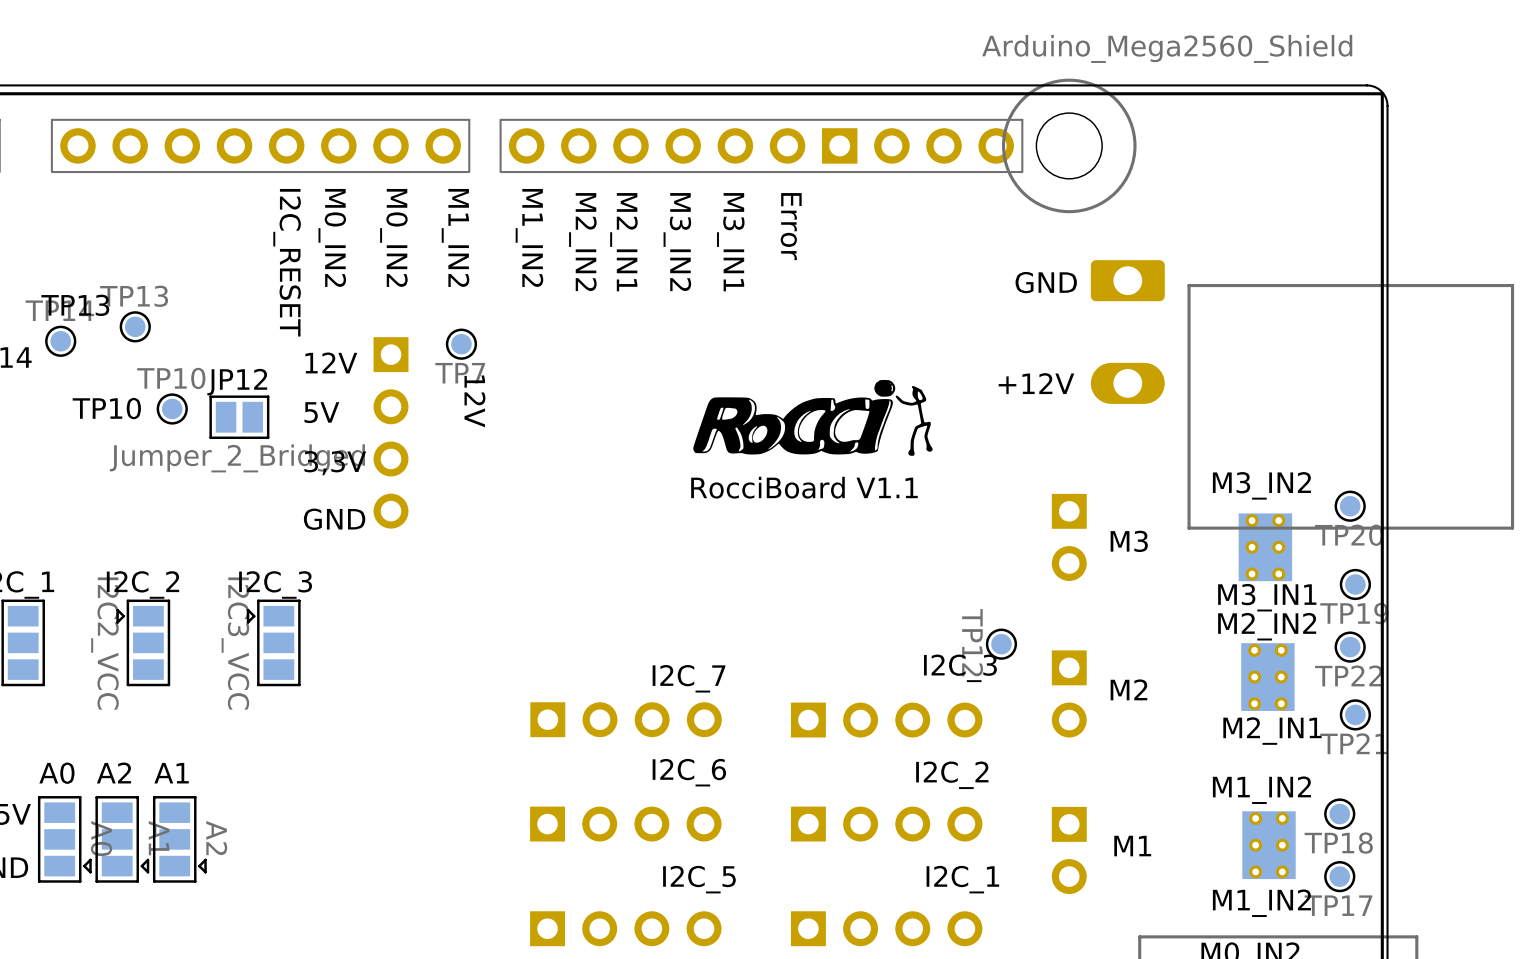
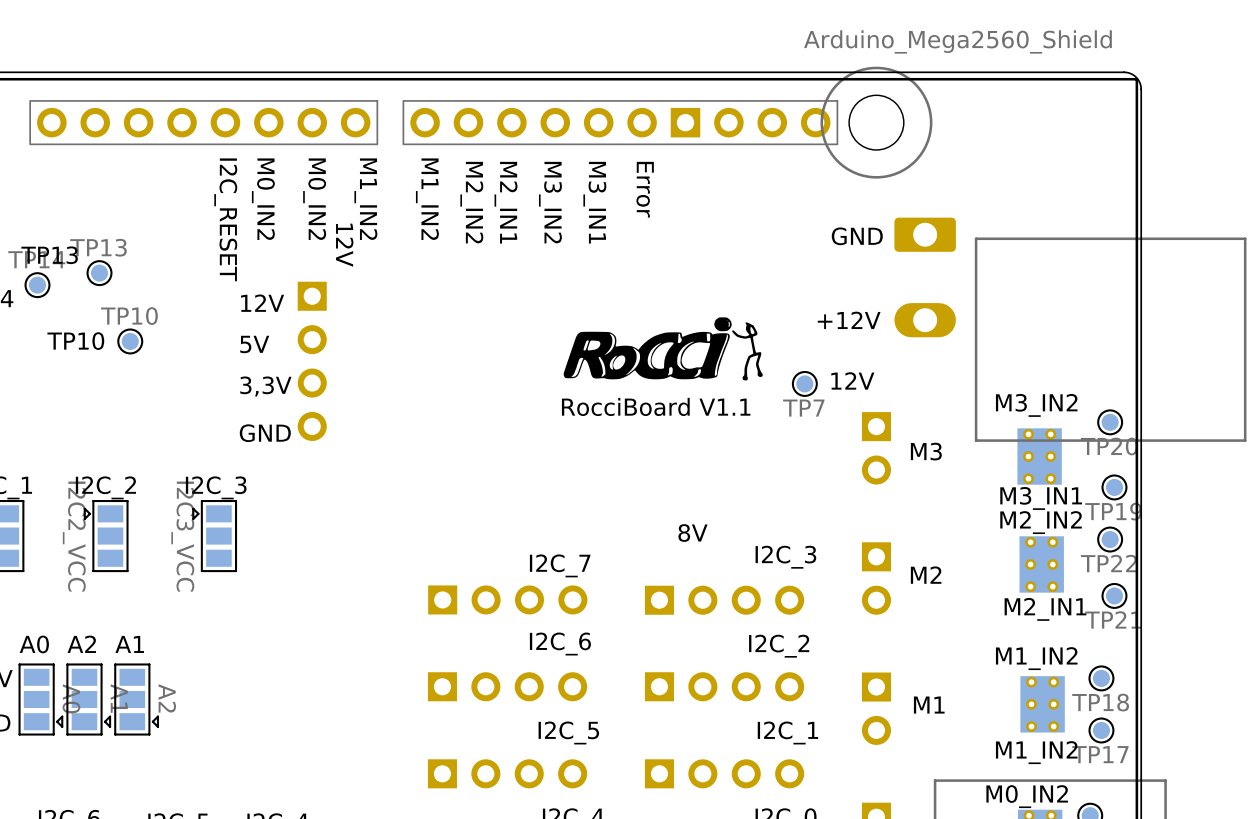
TP7 position: (461, 344) -> (804, 383)
text position: 12V (474, 401) -> 12V (344, 245)
JP12: Jumper_2_Bridged (239, 417) -> none
text: none -> 12V (852, 380)
text: none -> 8V (692, 533)
TP12: (1001, 644) -> none

